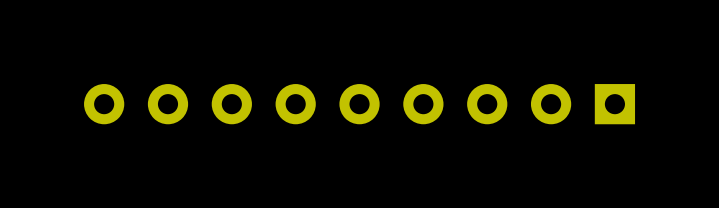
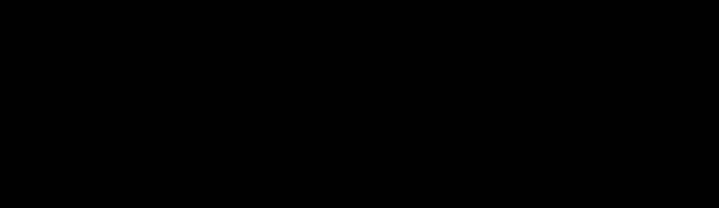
part: (359, 104) -> none

